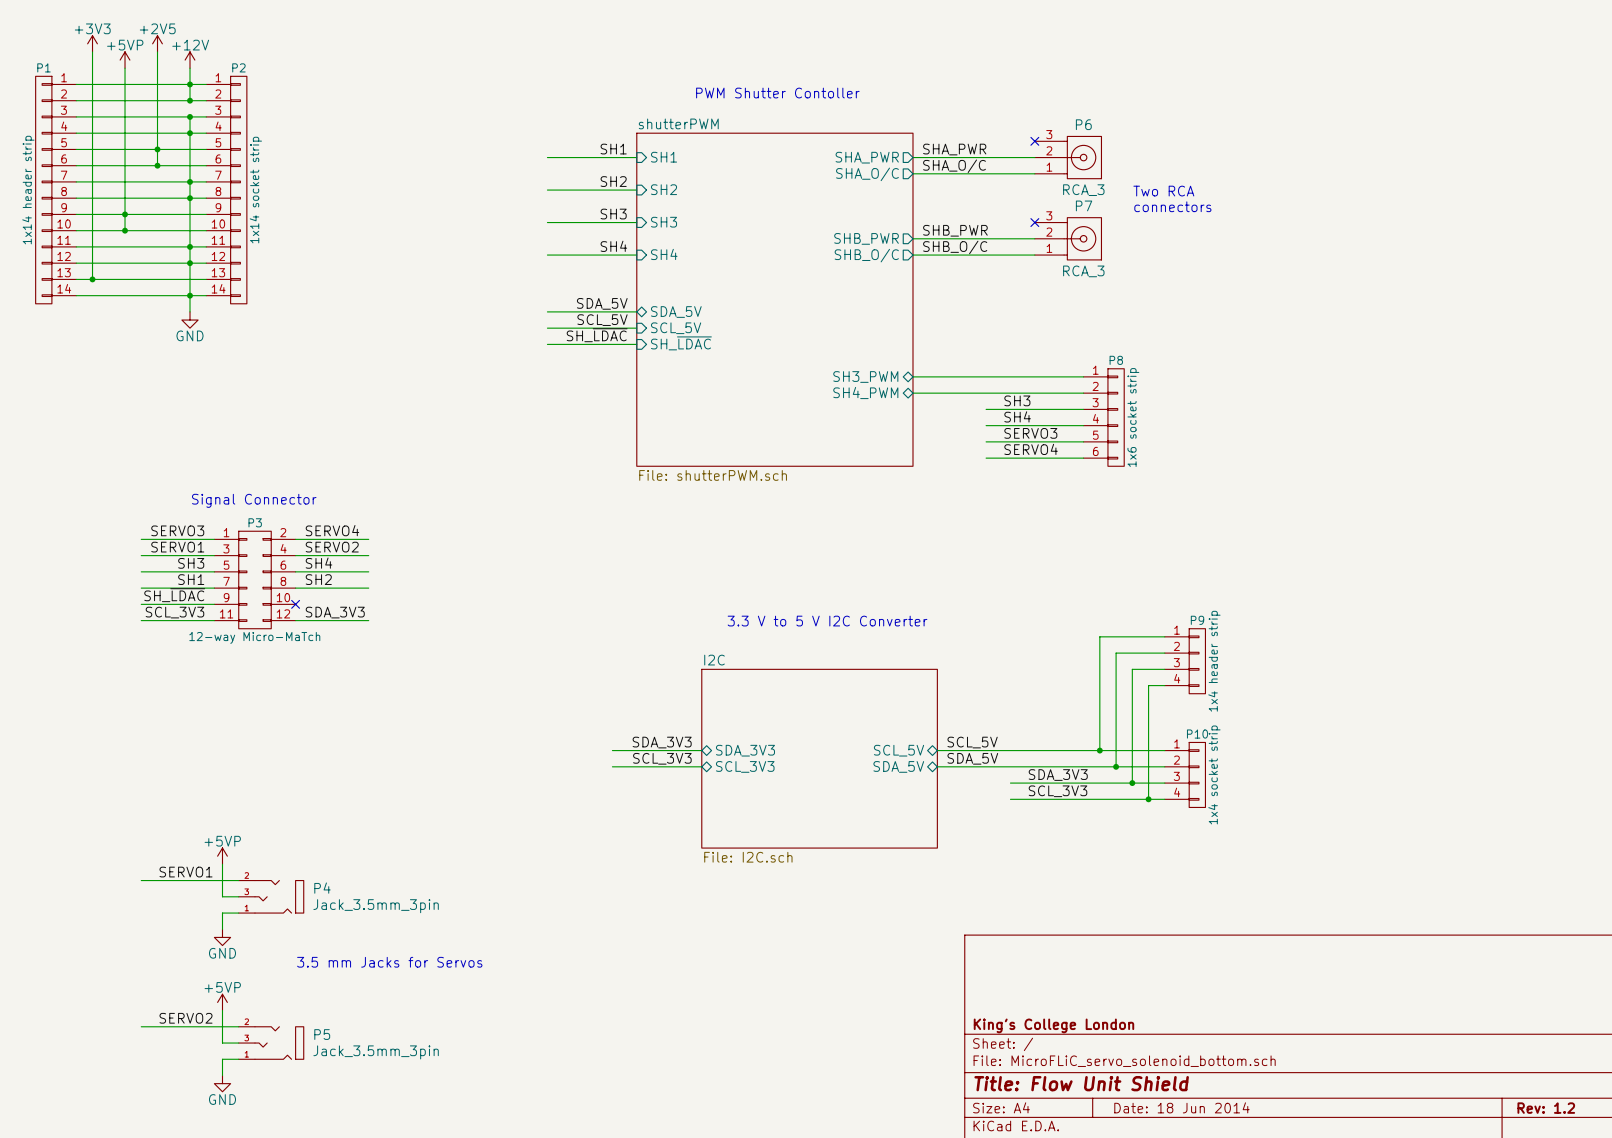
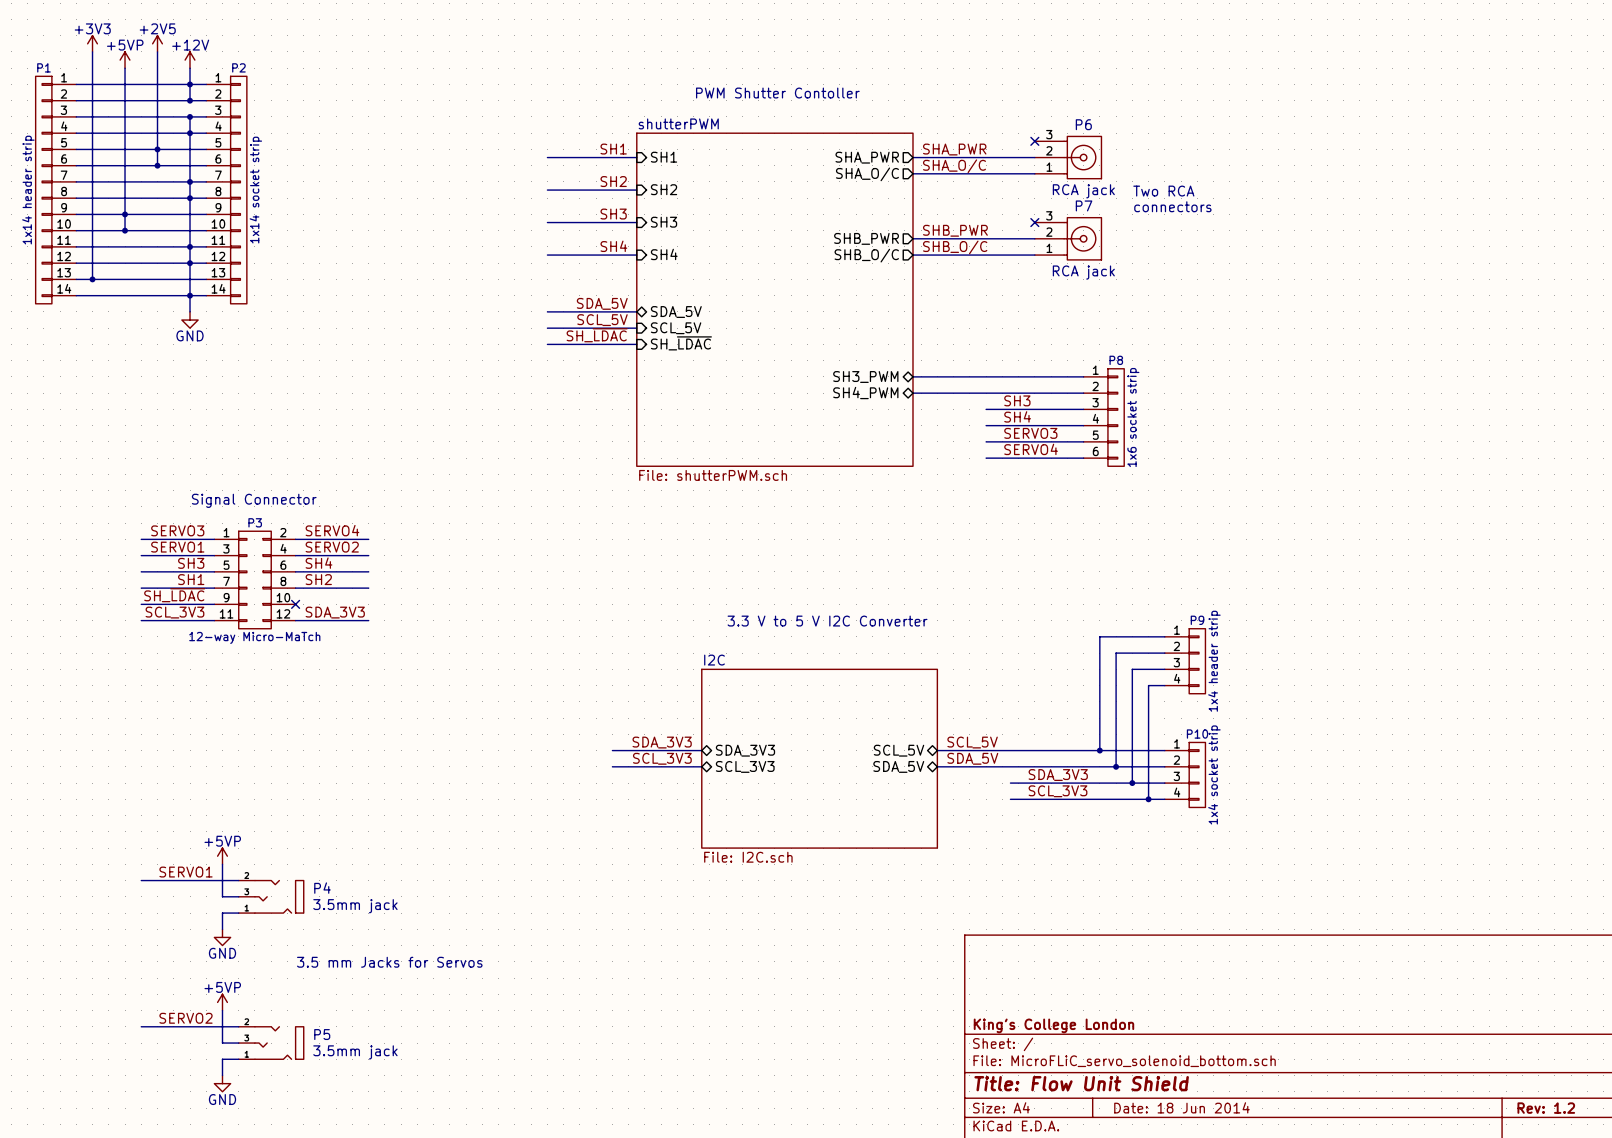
P6 value: RCA_3 (1083, 190) -> RCA jack (1083, 191)
P7 value: RCA_3 (1083, 271) -> RCA jack (1083, 272)
P4 value: Jack_3.5mm_3pin (376, 906) -> 3.5mm jack (355, 906)
P5 value: Jack_3.5mm_3pin (376, 1052) -> 3.5mm jack (355, 1052)

